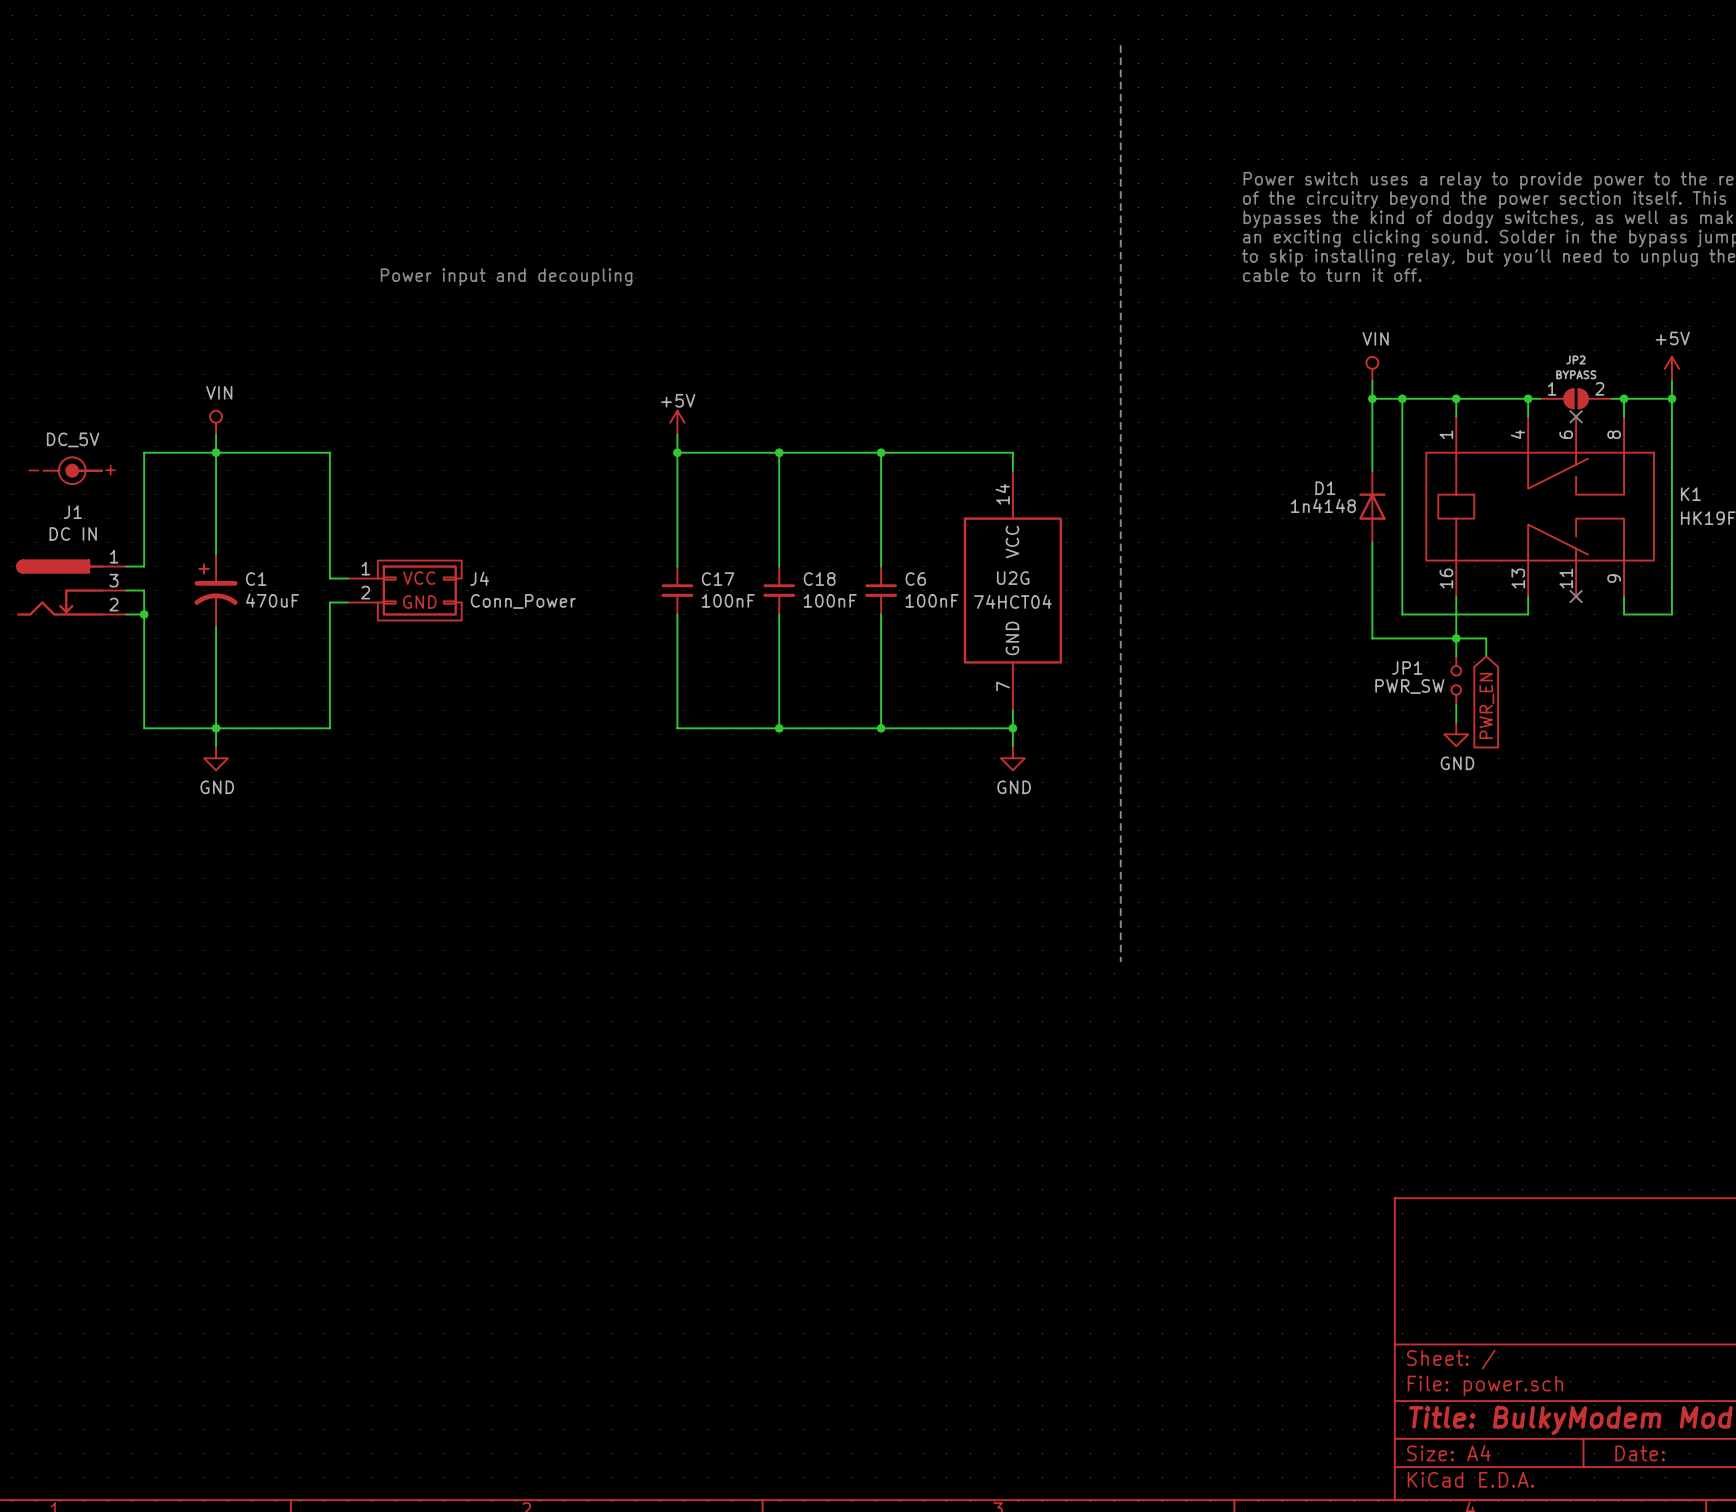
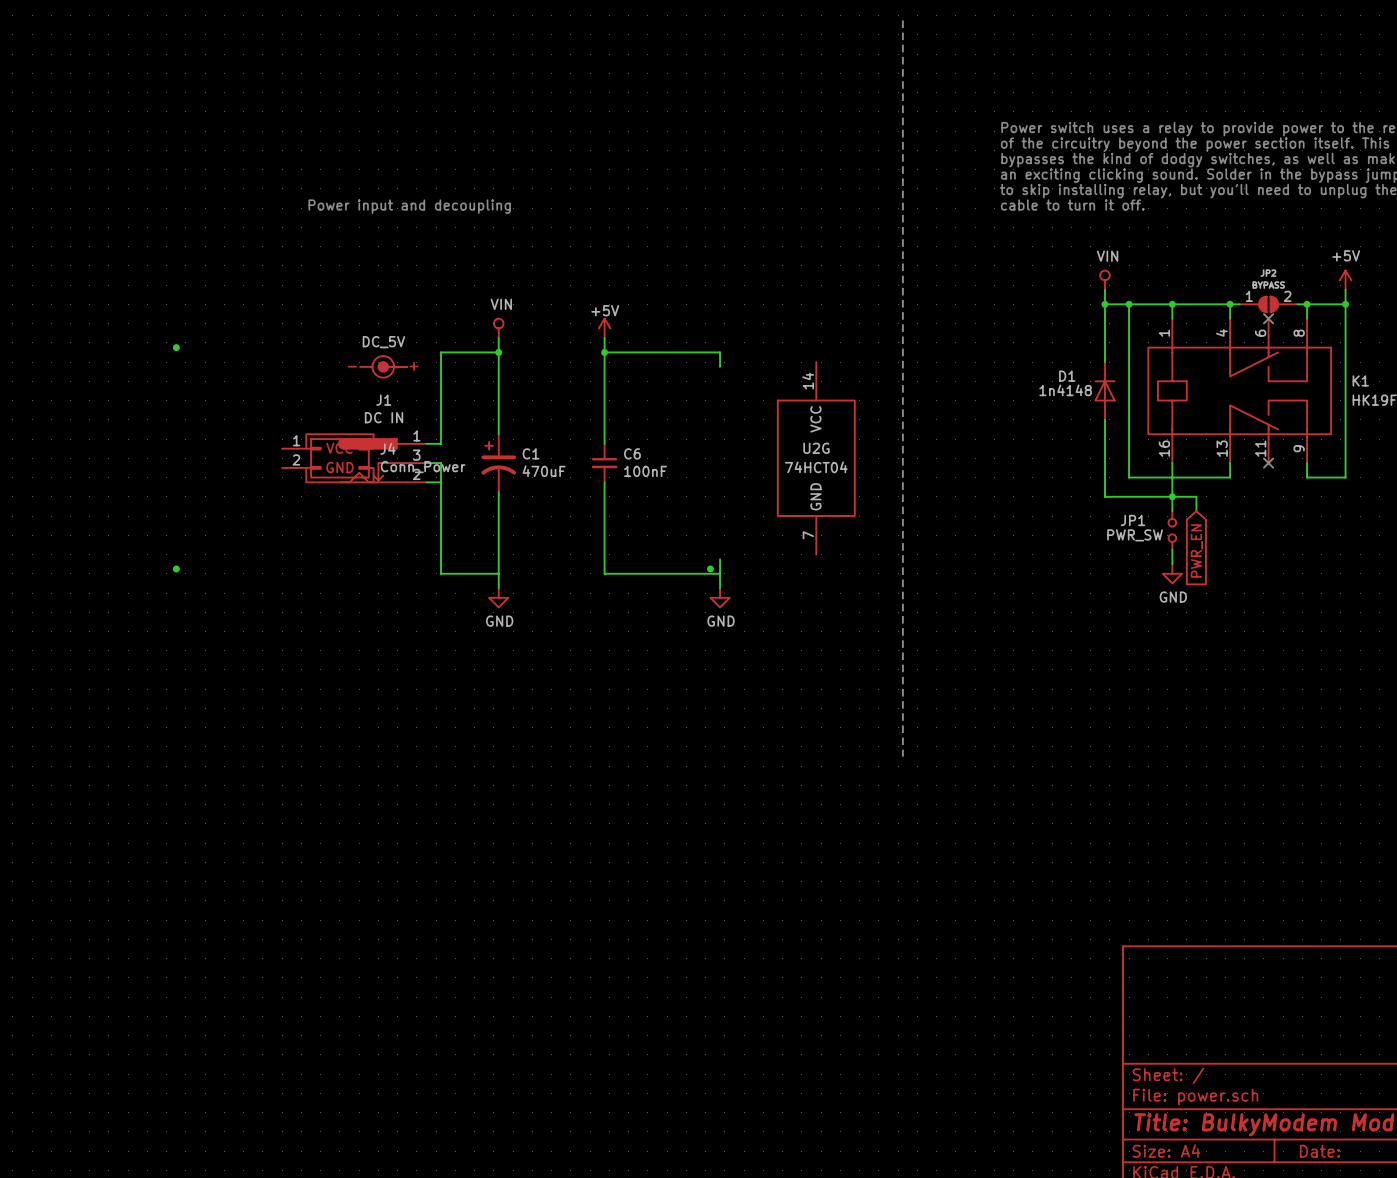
power symbol: VIN (216, 422) -> none
power symbol position: +5V (677, 422) -> +5V (604, 328)
power symbol: none -> VIN (498, 328)
wire: (216, 434) (216, 554) -> none
wire: (677, 434) (677, 566) -> (604, 338) (604, 443)
wire: none -> (498, 338) (498, 434)
wire: (677, 452) (1012, 452) (1012, 470) -> none
junction: (677, 452) -> none
wire: (779, 452) (779, 566) -> none
junction position: (779, 452) -> (604, 352)
wire: (881, 452) (881, 566) -> none
junction: (881, 452) -> none
wire: none -> (498, 352) (440, 352) (440, 443) (426, 443)
junction: none -> (498, 352)
wire: none -> (604, 352) (720, 352) (720, 366)
part: DC_5V (72, 470) -> none
part: none -> DC_5V (383, 366)
wire: (126, 566) (144, 566) (144, 452) (329, 452) (329, 578) (347, 578) -> none
J1 position: (71, 587) -> (382, 460)
wire: (126, 590) (144, 590) (144, 728) (329, 728) (329, 602) (347, 602) -> none
C1 position: (216, 590) -> (498, 463)
C17: 100nF (677, 590) -> none
C18: 100nF (779, 590) -> none
C6 position: (881, 590) -> (604, 463)
wire: none -> (426, 463) (440, 463) (440, 573) (498, 573)
wire: (126, 614) (144, 614) -> none
junction: (144, 614) -> none
wire: (677, 614) (677, 728) (1012, 728) -> none
wire: (779, 614) (779, 728) -> none
wire: (881, 614) (881, 728) -> none
wire: none -> (426, 482) (440, 482)
wire: none -> (604, 482) (604, 573) (720, 573)
wire: (216, 626) (216, 746) -> none
wire: none -> (498, 491) (498, 588)
wire: (1012, 710) (1012, 746) -> none
wire: none -> (720, 559) (720, 573)
junction: (779, 728) -> none
junction: (1012, 728) -> none
wire: none -> (720, 573) (720, 588)
power symbol: GND (216, 758) -> none
power symbol position: GND (1012, 758) -> GND (720, 597)
power symbol: none -> GND (498, 597)

